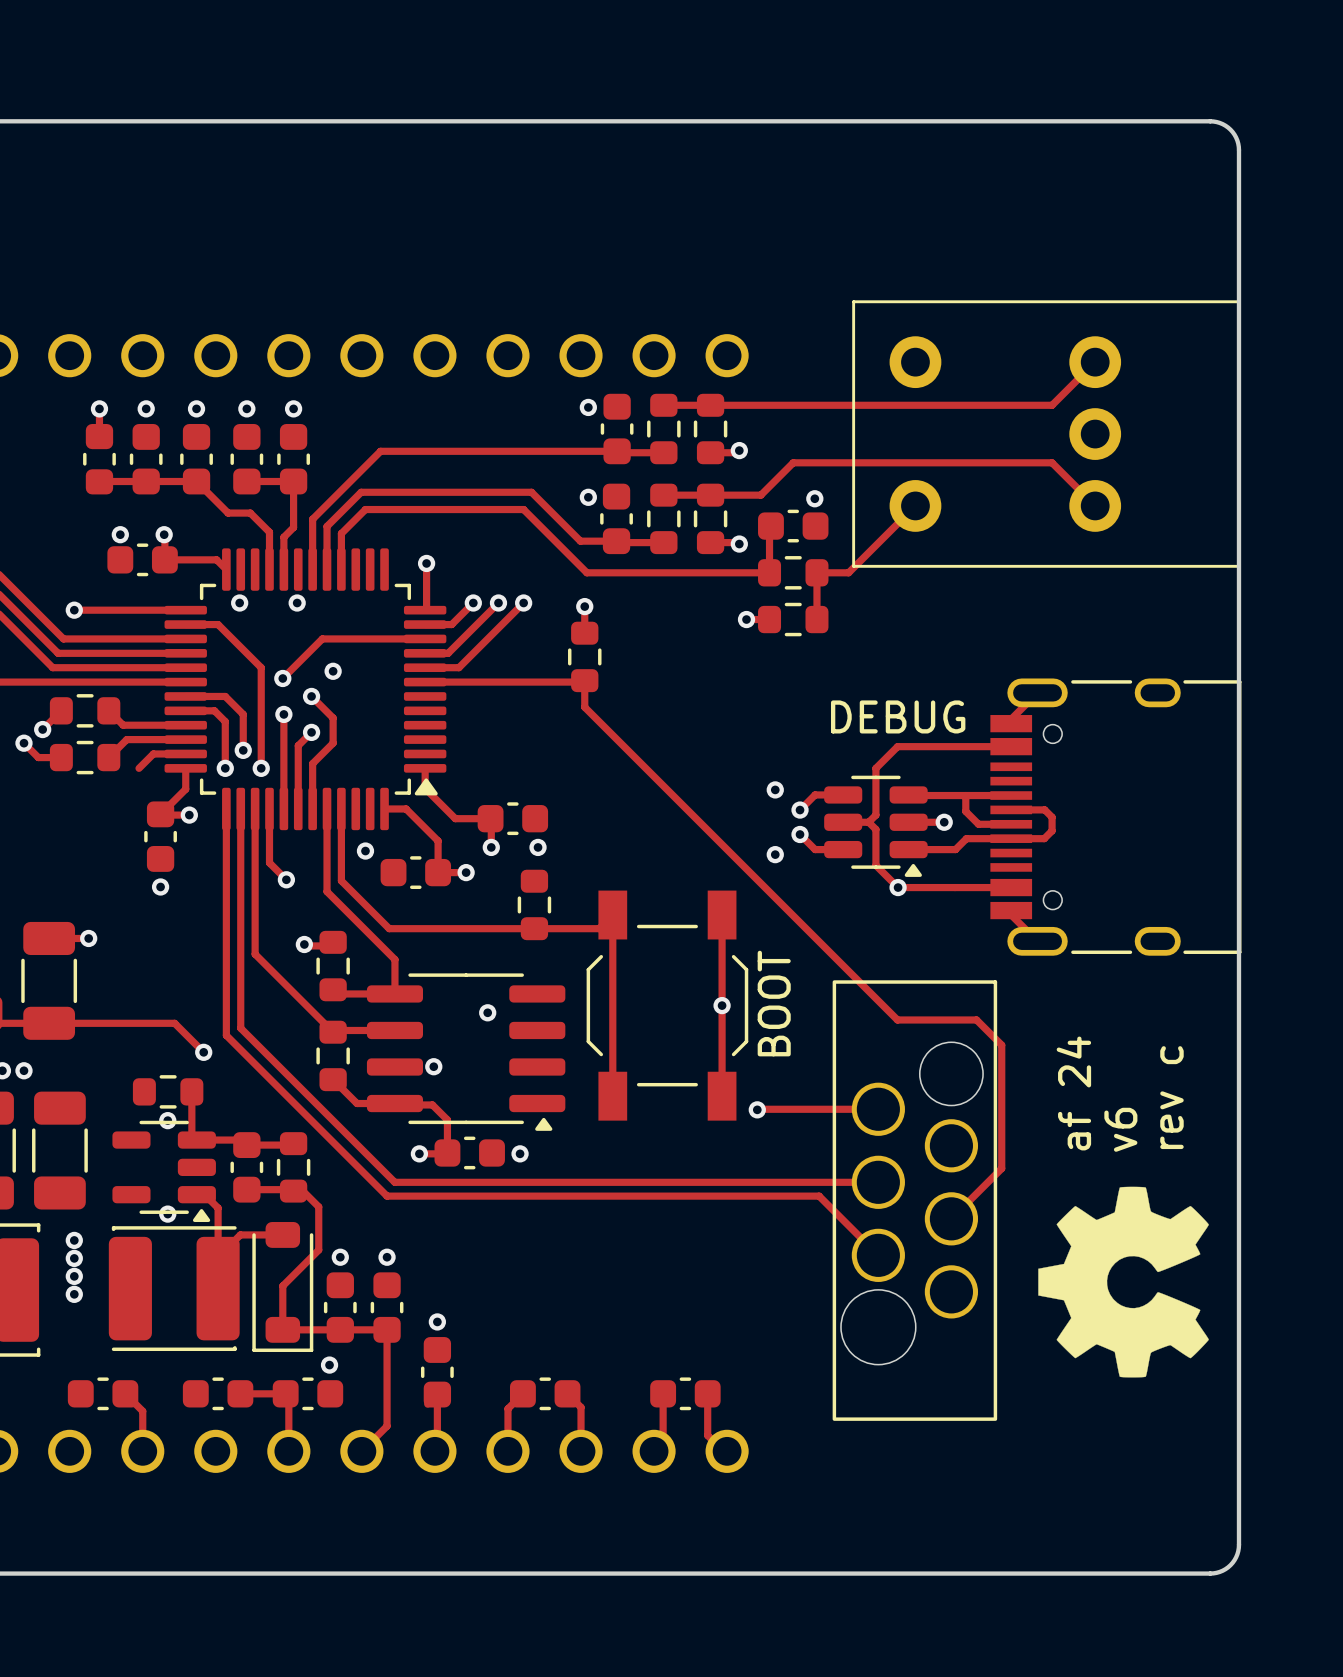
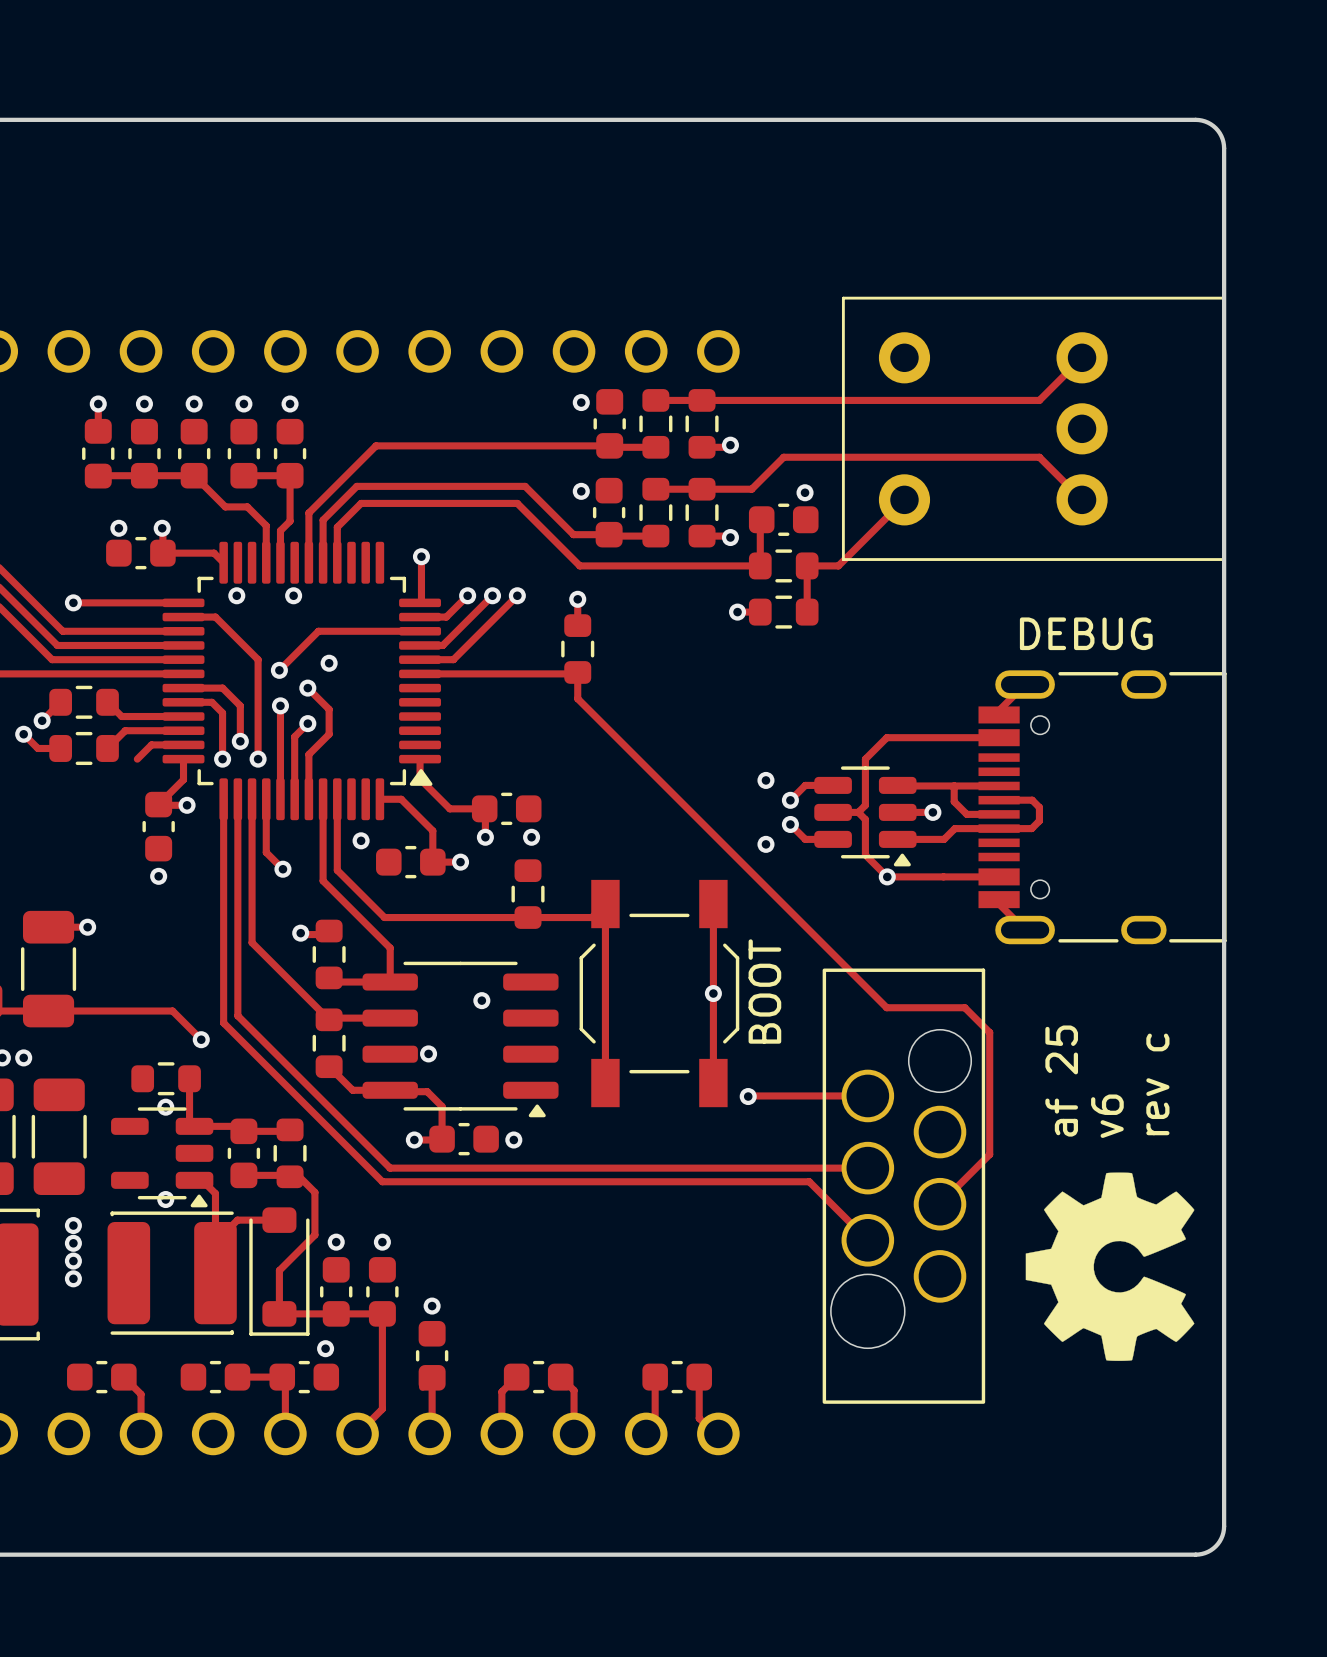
part value position: DEBUG (898, 716) -> DEBUG (1086, 633)
text: af 24 (1073, 1093) -> af 25 (1061, 1081)

